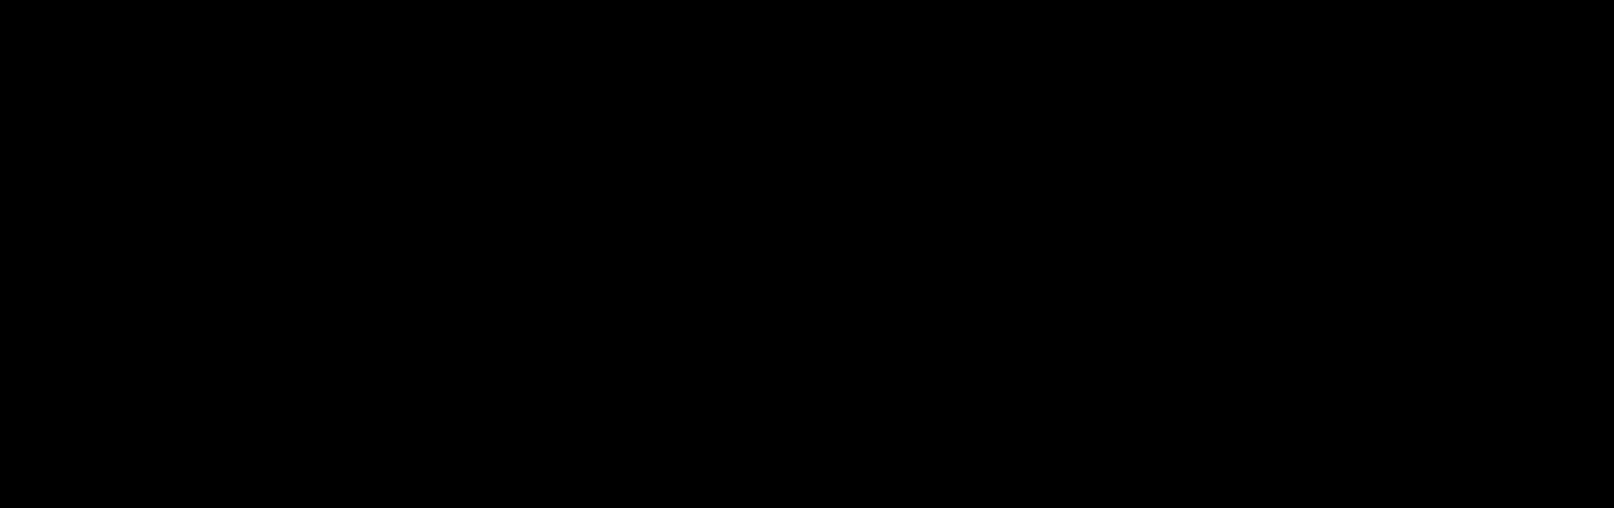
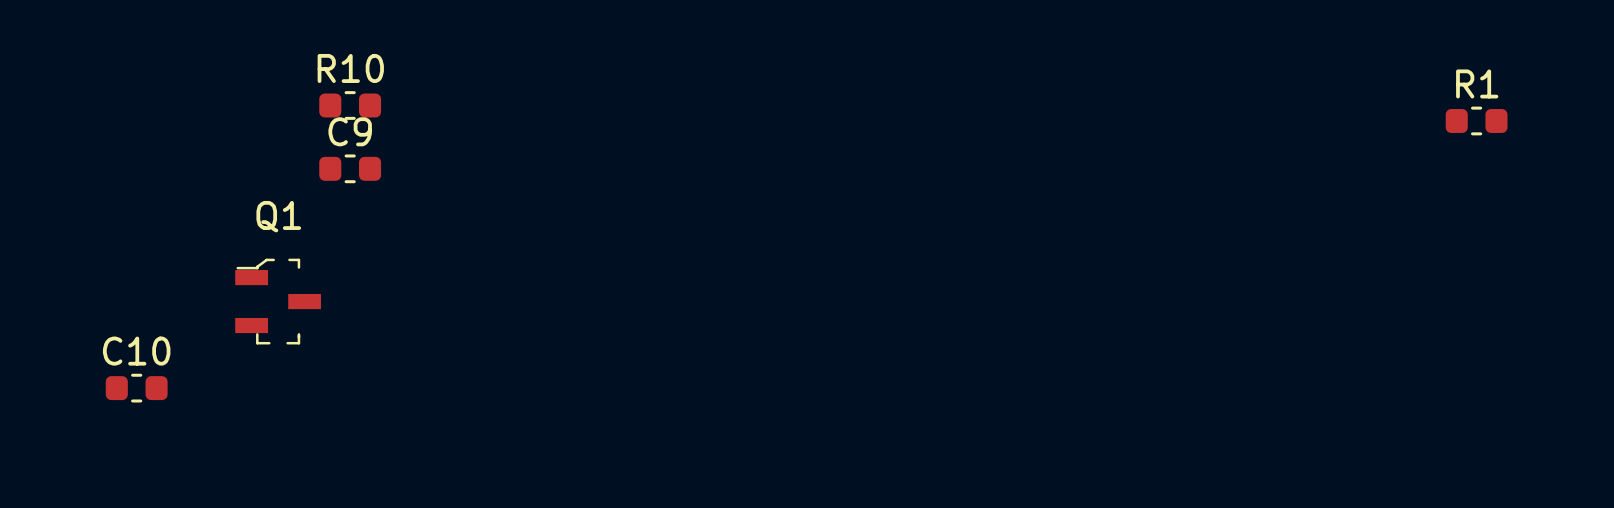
R10: none -> (350, 105)
R1: none -> (1476, 120)
C9: none -> (350, 168)
Q1: none -> (278, 301)
C10: none -> (136, 388)

